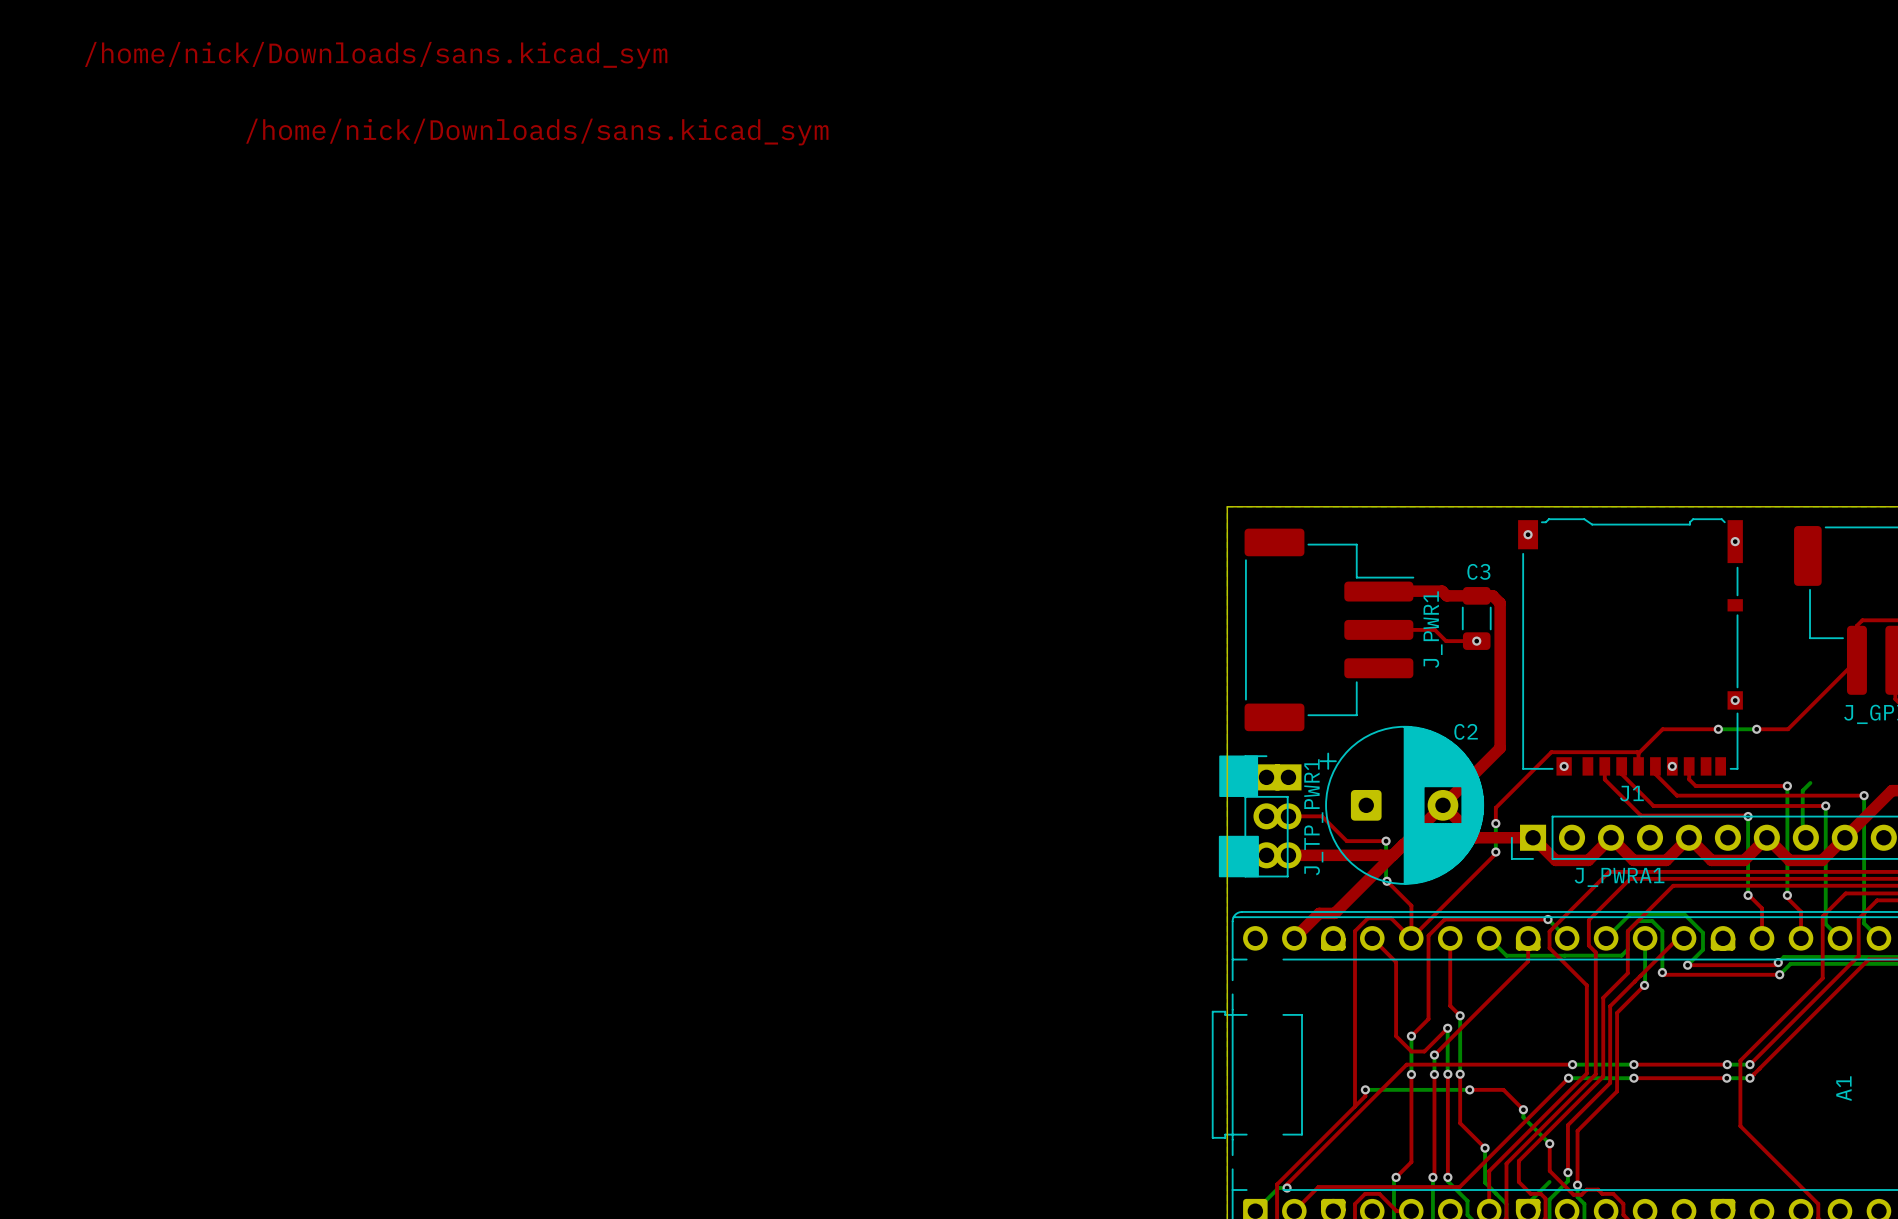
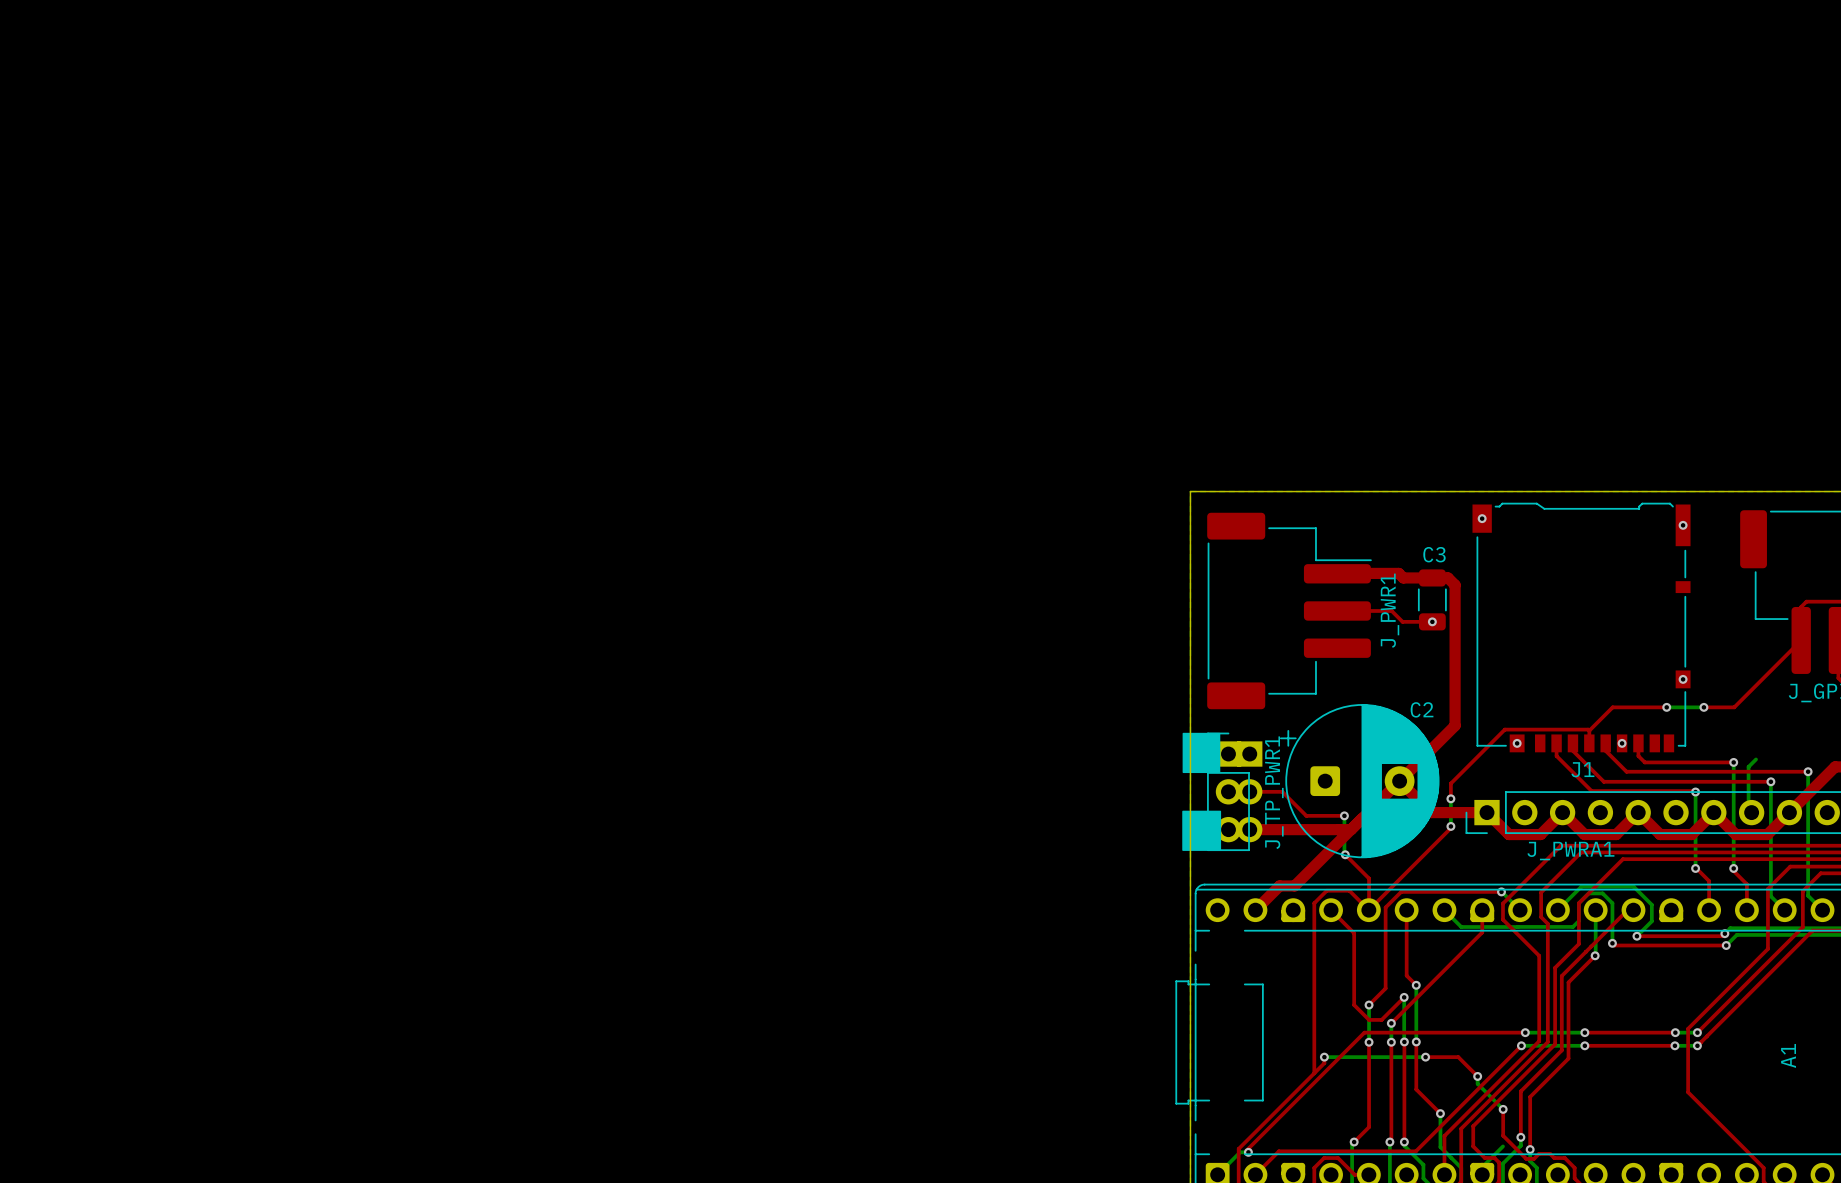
text: /home/nick/Downloads/sans.kicad_sym (376, 55) -> none
text: /home/nick/Downloads/sans.kicad_sym (537, 132) -> none

